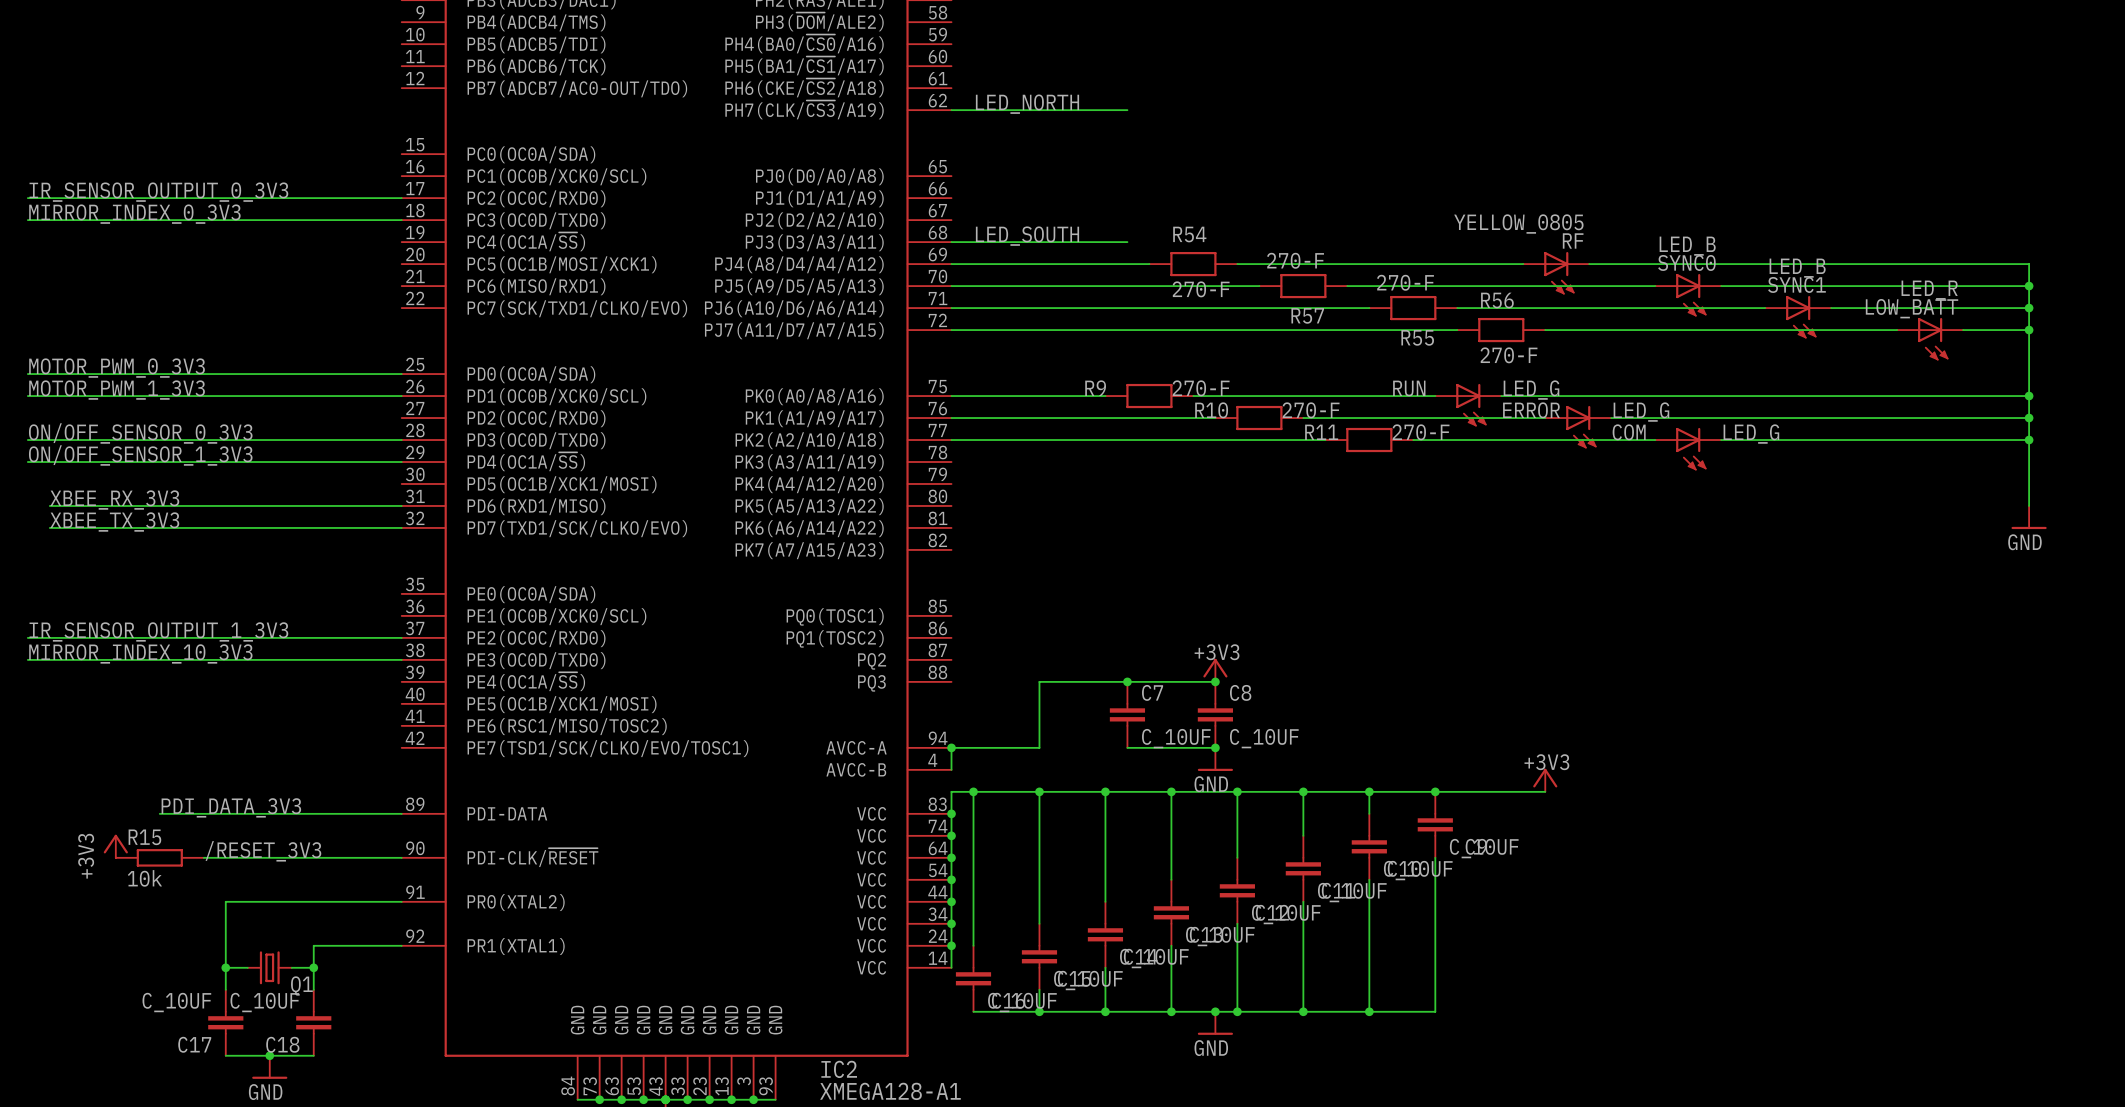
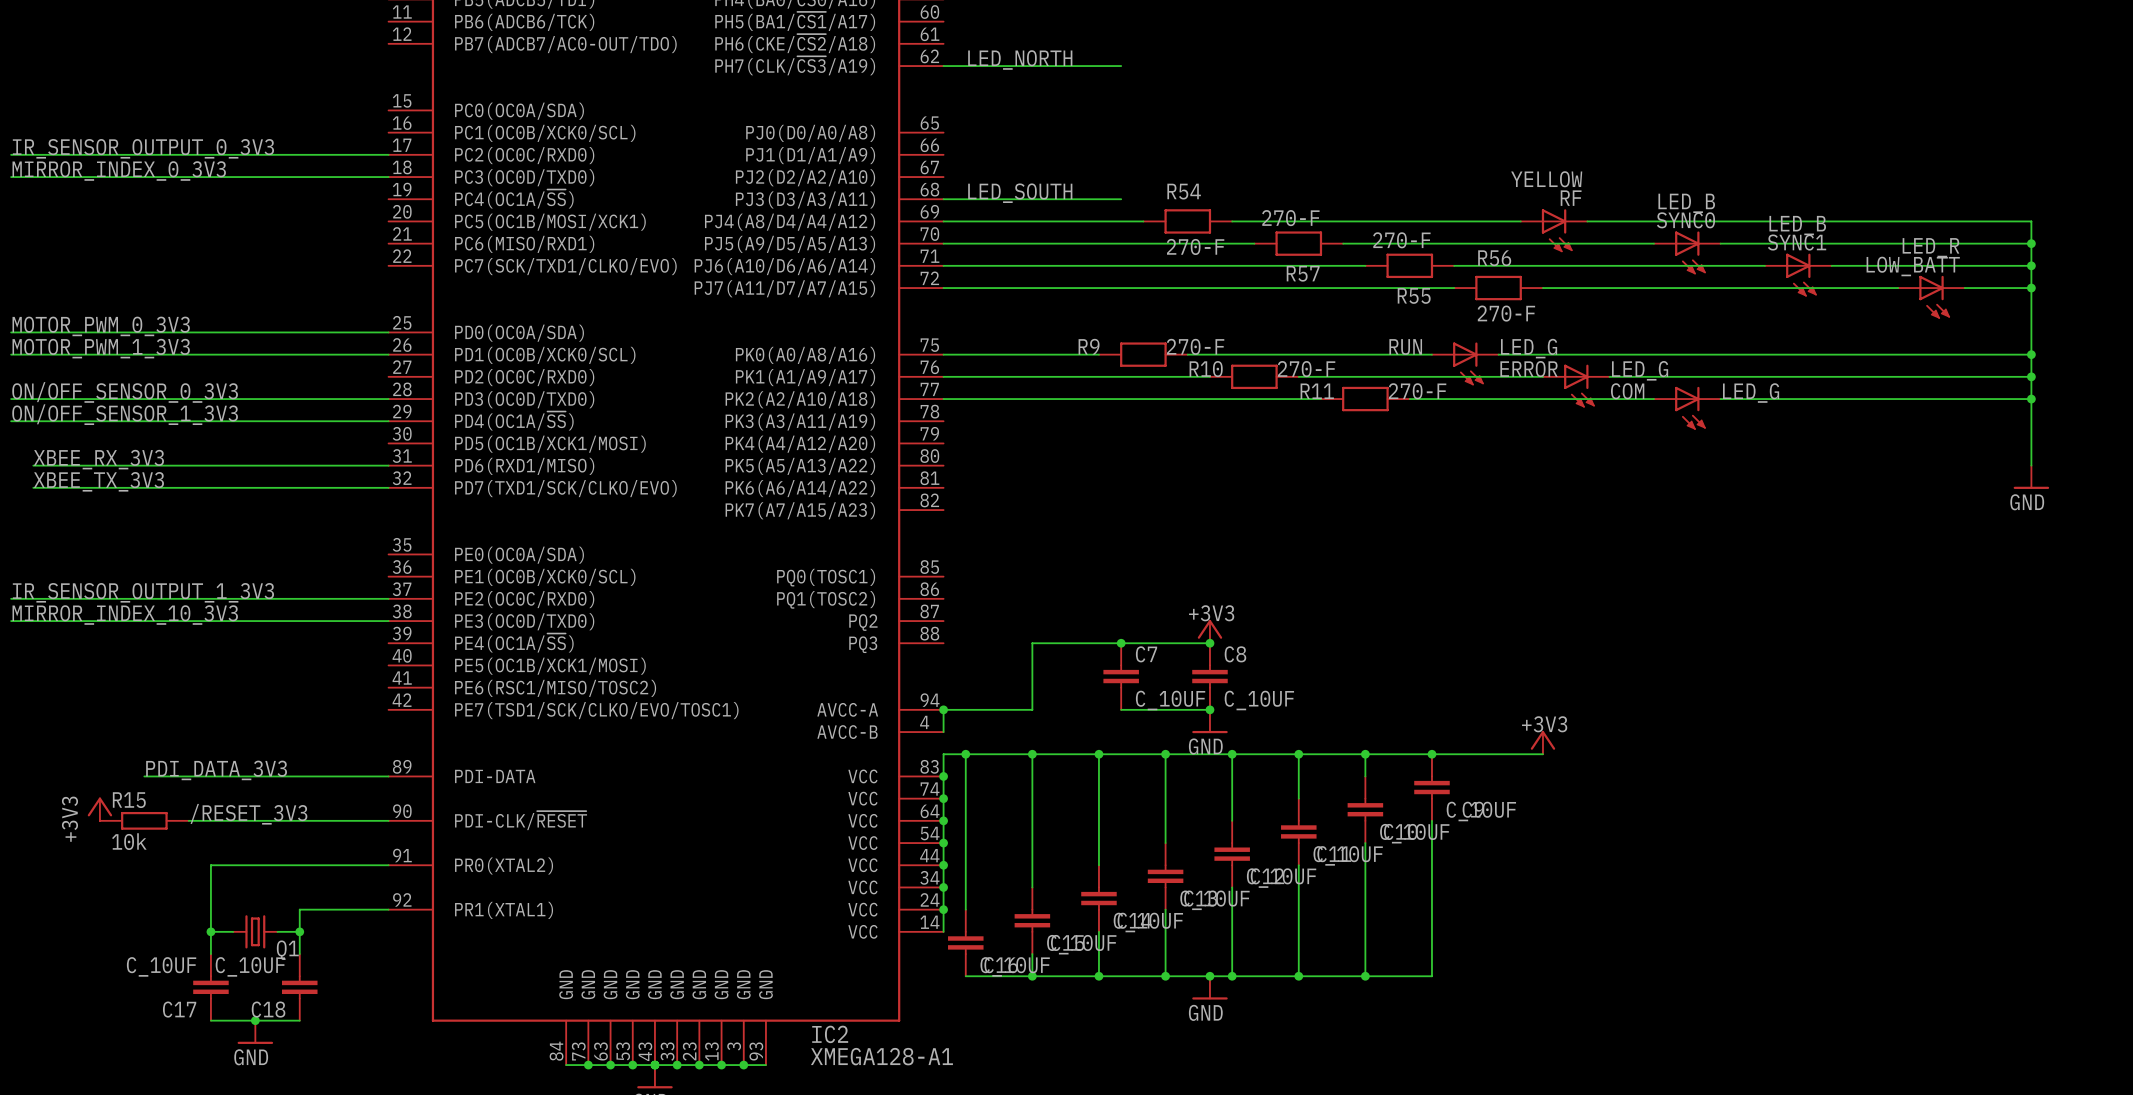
RF value: YELLOW_0805 (1518, 224) -> YELLOW (1546, 179)

